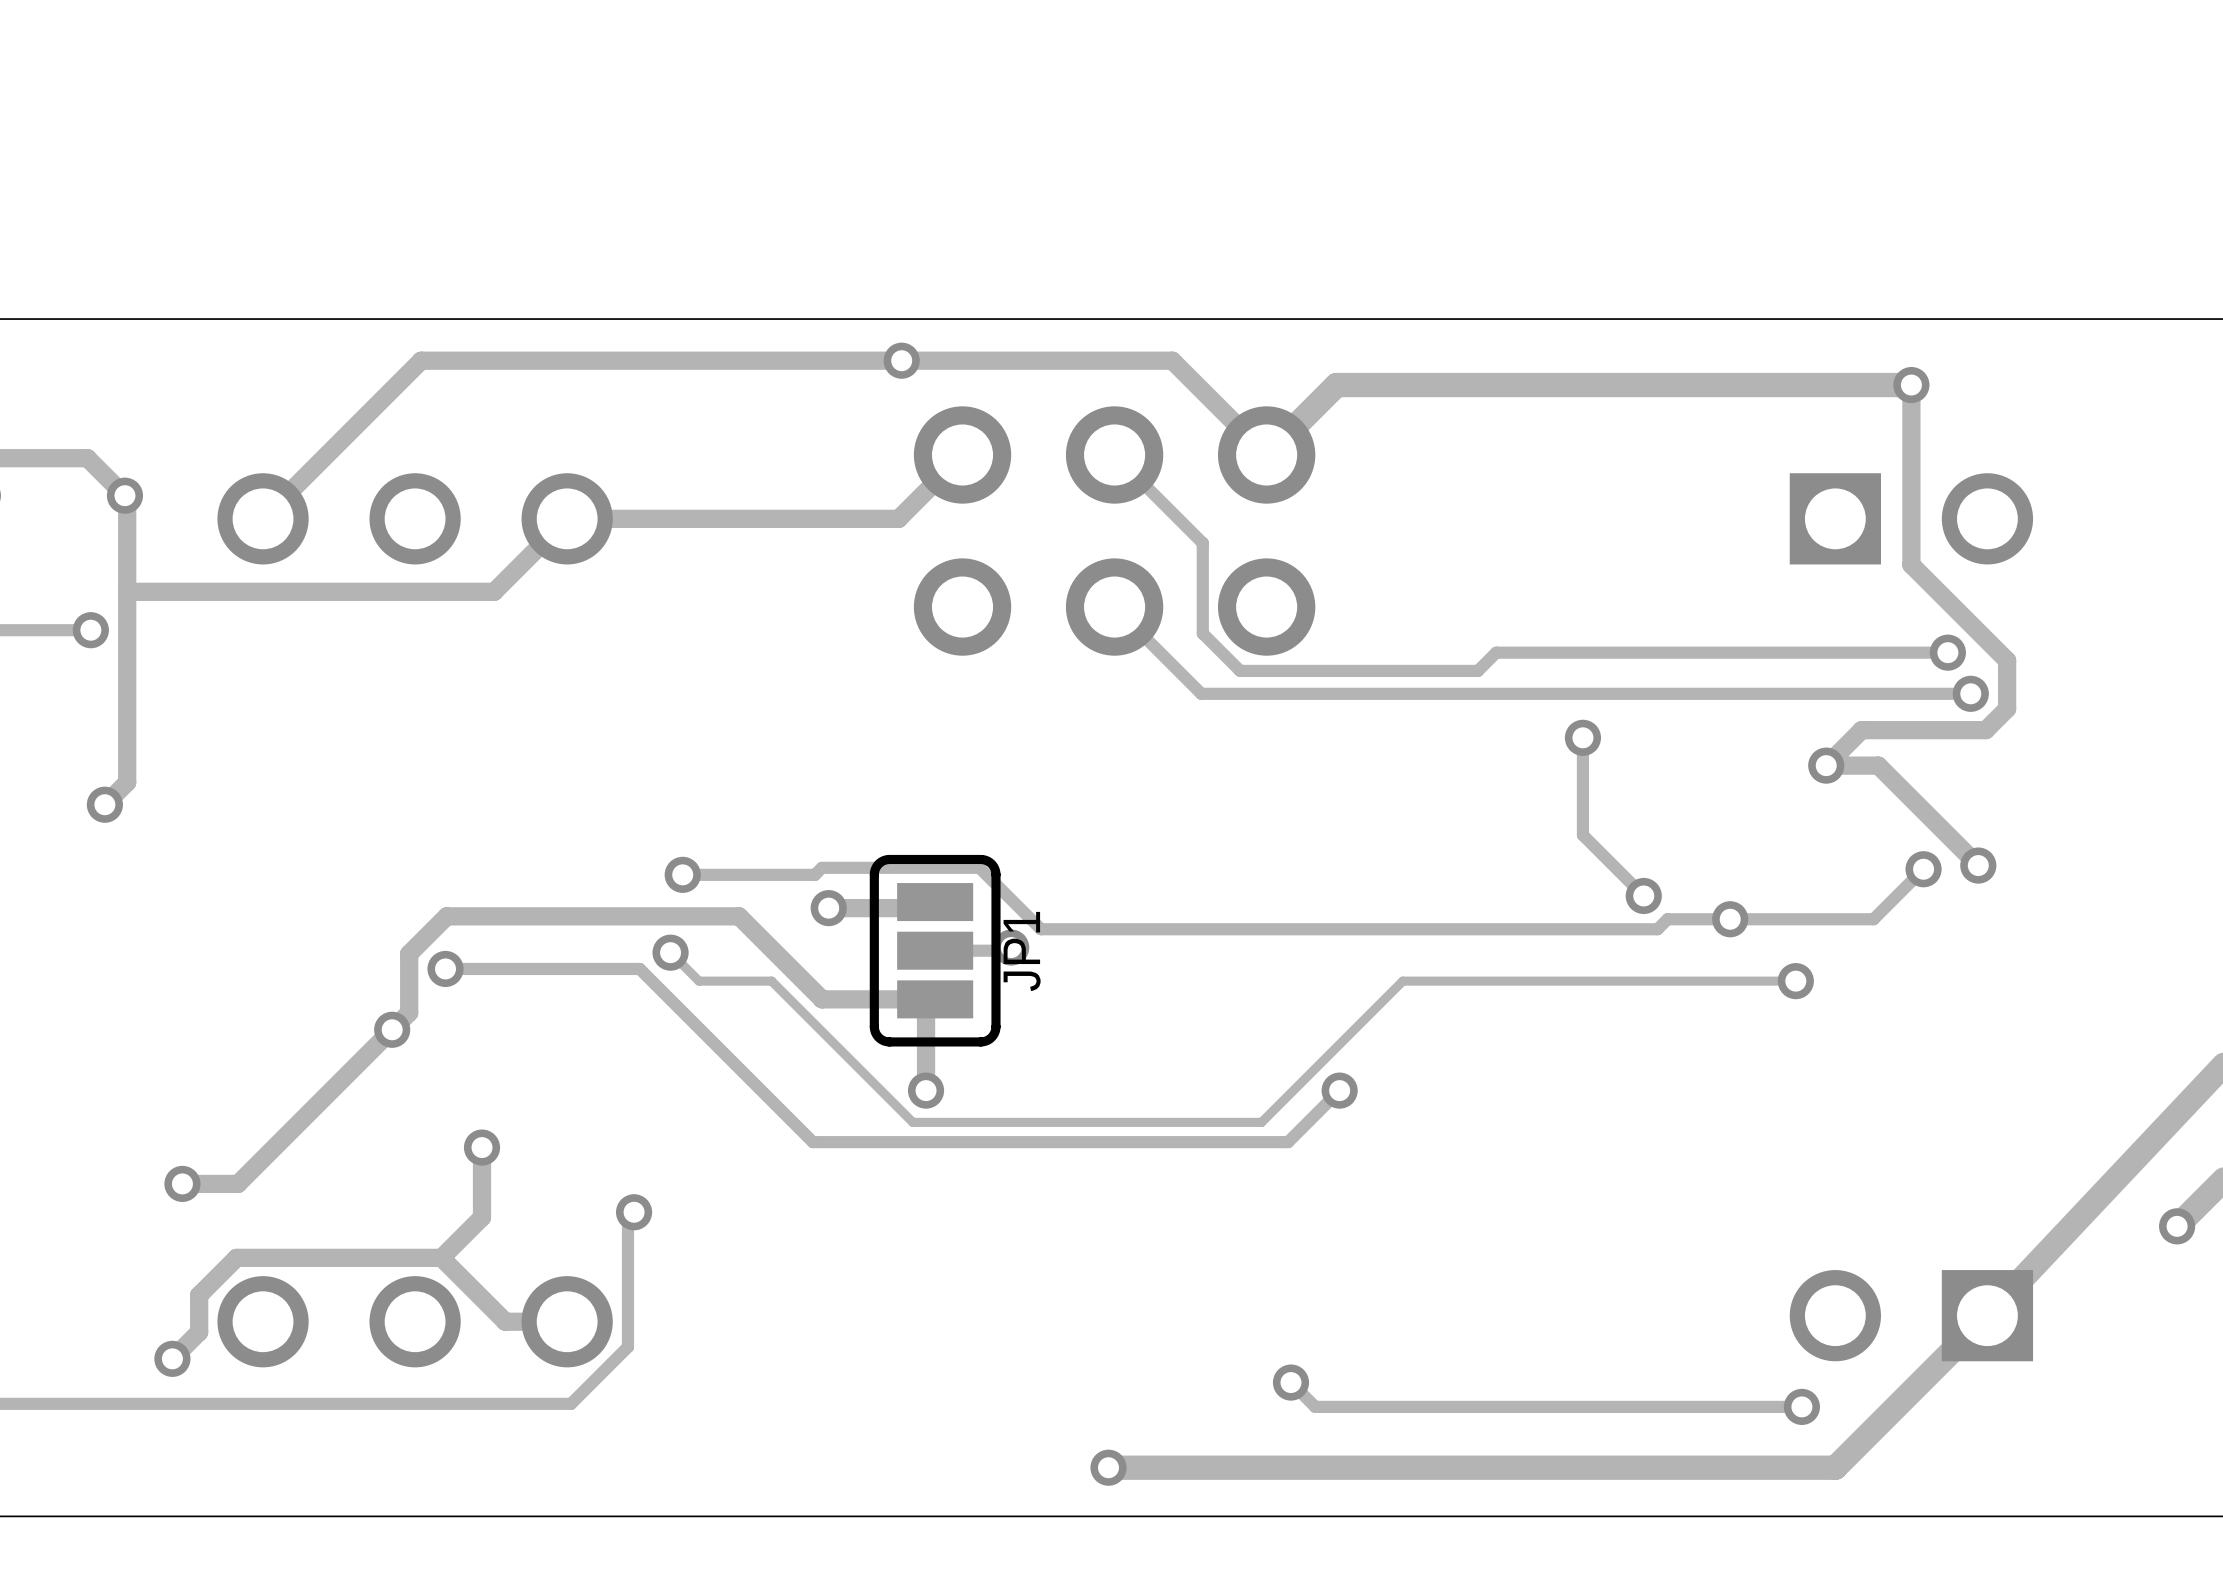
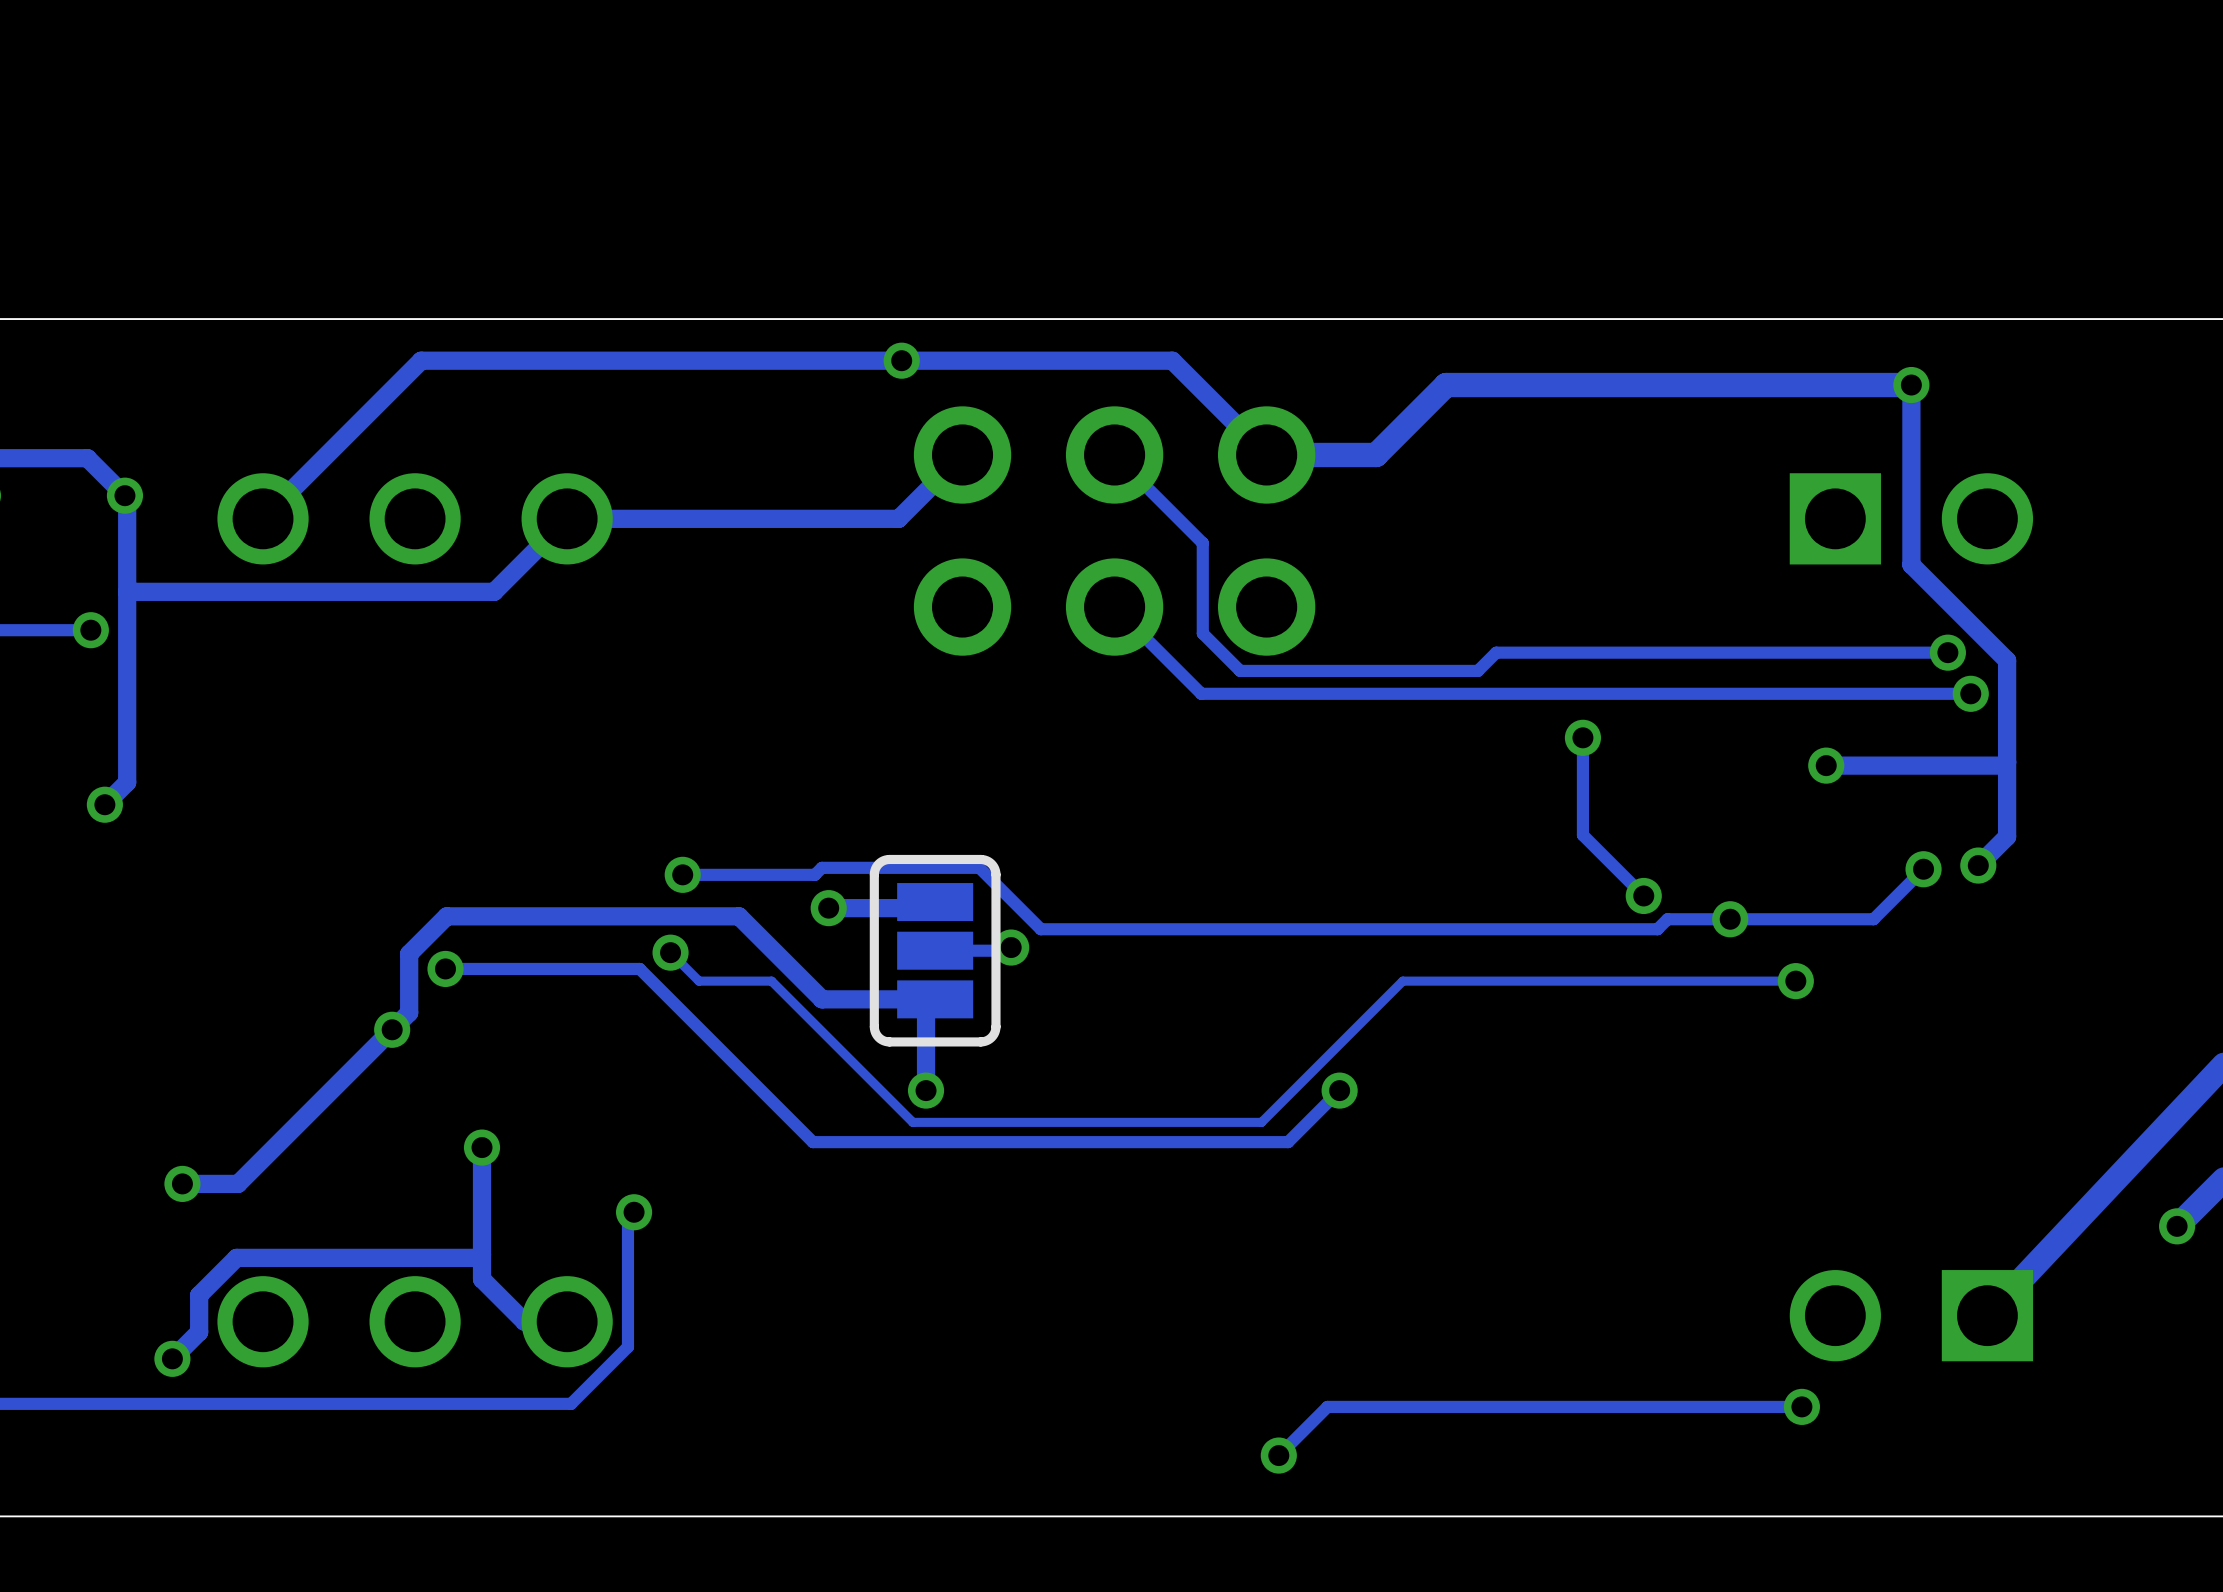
track: (1446, 385) (1336, 385) (1266, 454) -> (1446, 385) (1376, 454) (1266, 454)
track: (2007, 708) (1985, 730) (1861, 730) (1826, 765) -> (2007, 708) (2007, 836) (1978, 865)
track: (1878, 765) (1978, 865) -> (1878, 765) (2003, 765) (2007, 762)
JP1 name: JP1 (1022, 951) -> none
track: (482, 1217) (441, 1257) (505, 1321) (524, 1321) -> (482, 1217) (482, 1279) (524, 1321)
track: none -> (482, 1254) (478, 1257) (441, 1257)
track: (1987, 1315) (1835, 1467) (1108, 1467) -> none
track: (1290, 1382) (1315, 1406) (1327, 1406) -> (1278, 1455) (1327, 1406)
via position: (1290, 1382) -> (1278, 1455)
via: (1108, 1467) -> none

